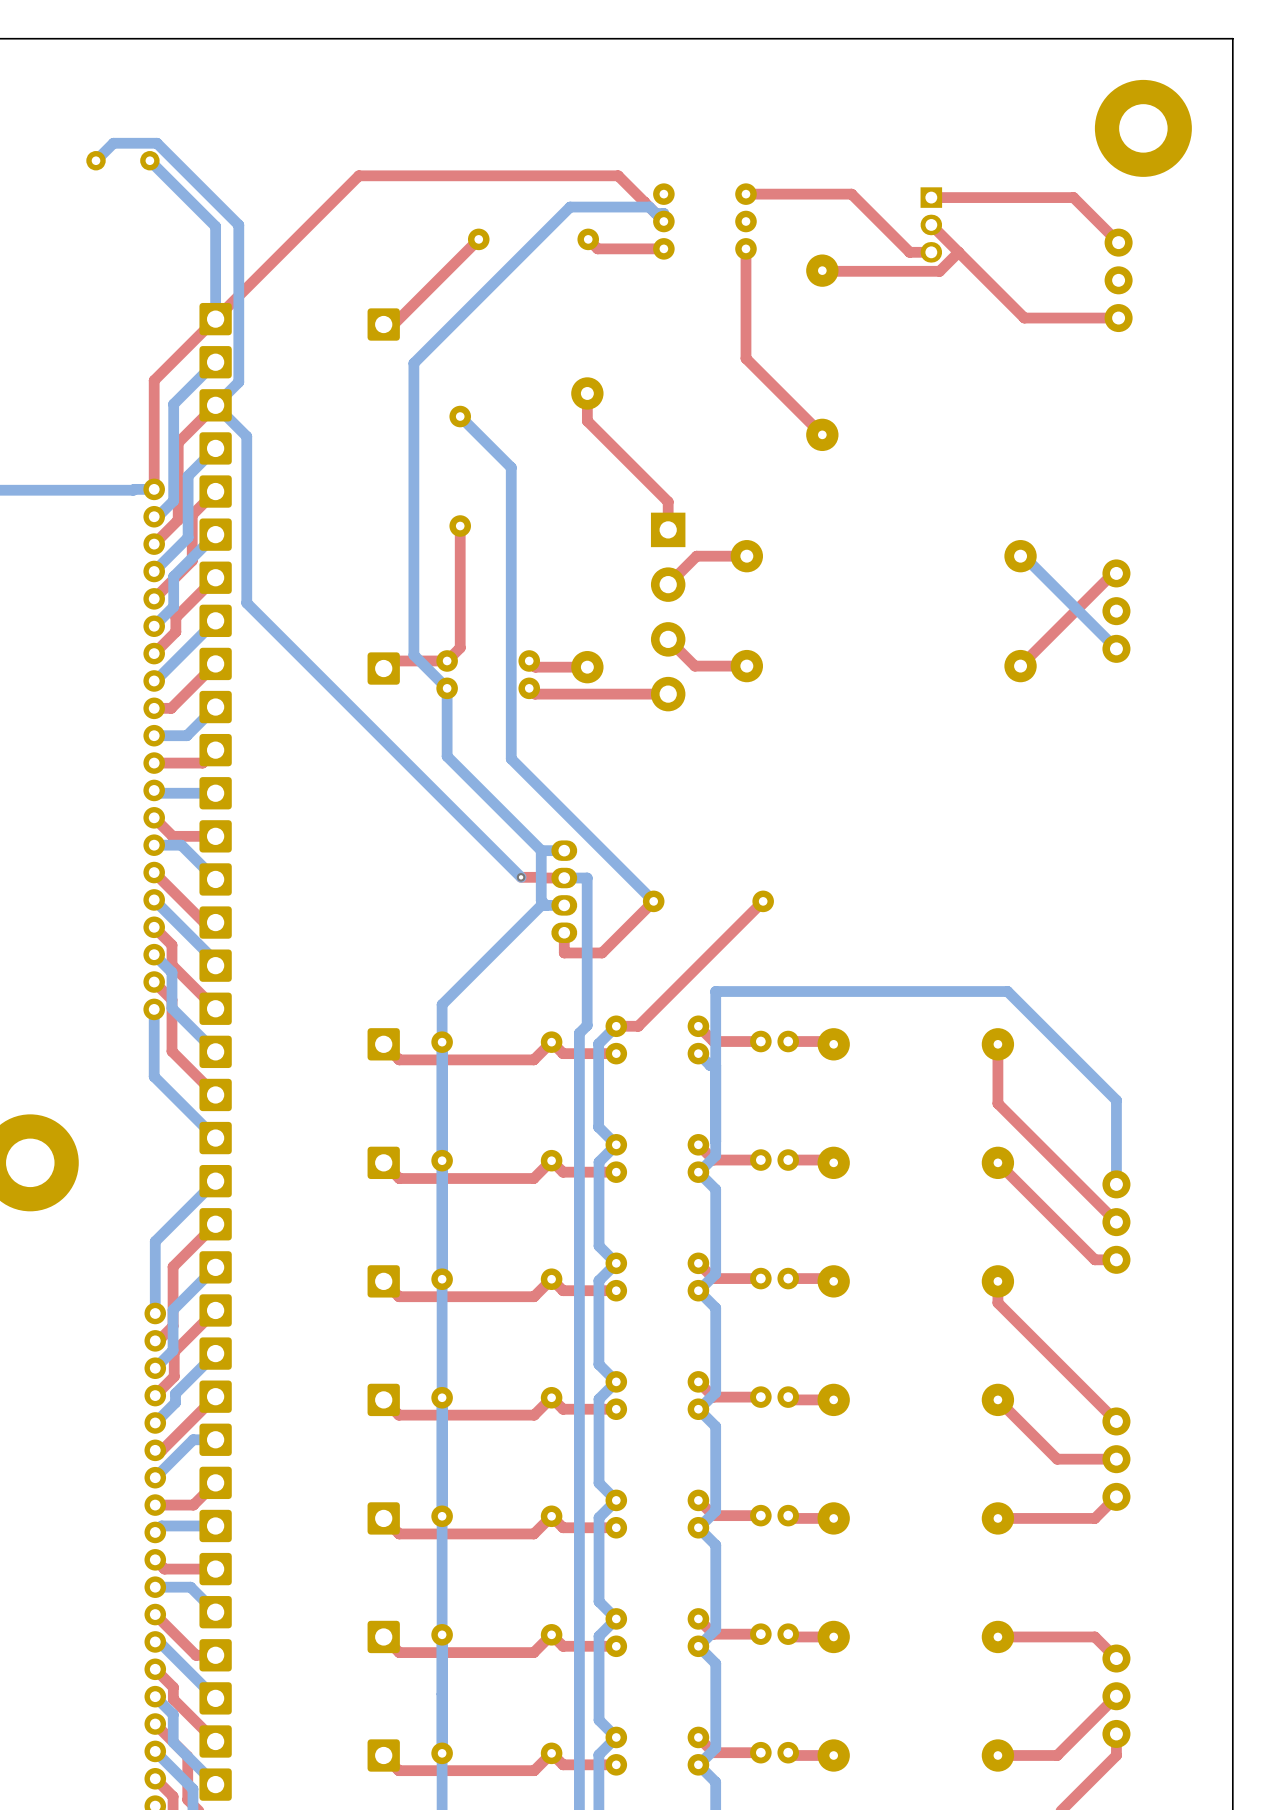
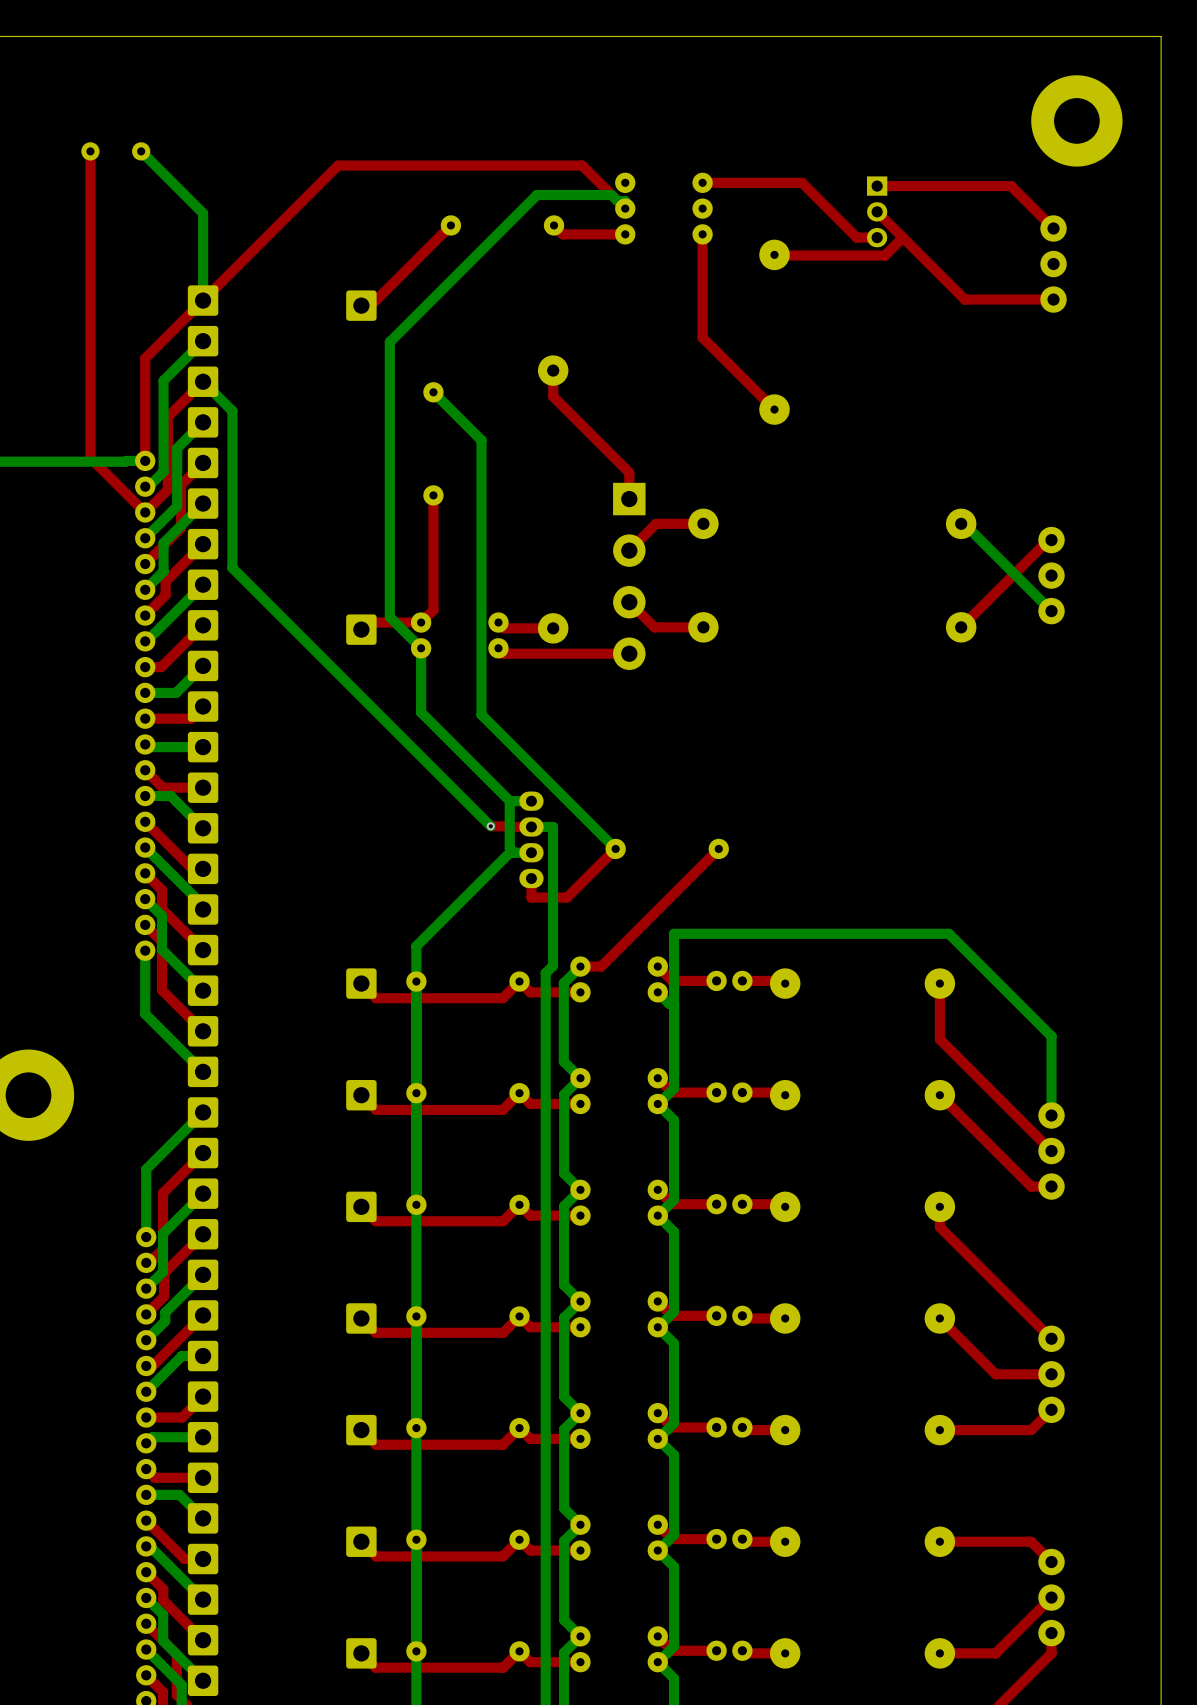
top track: none -> (90, 151) (90, 457) (142, 510) (147, 510)
bottom track: (96, 160) (113, 143) (156, 143) (238, 225) (238, 382) (215, 405) -> none

